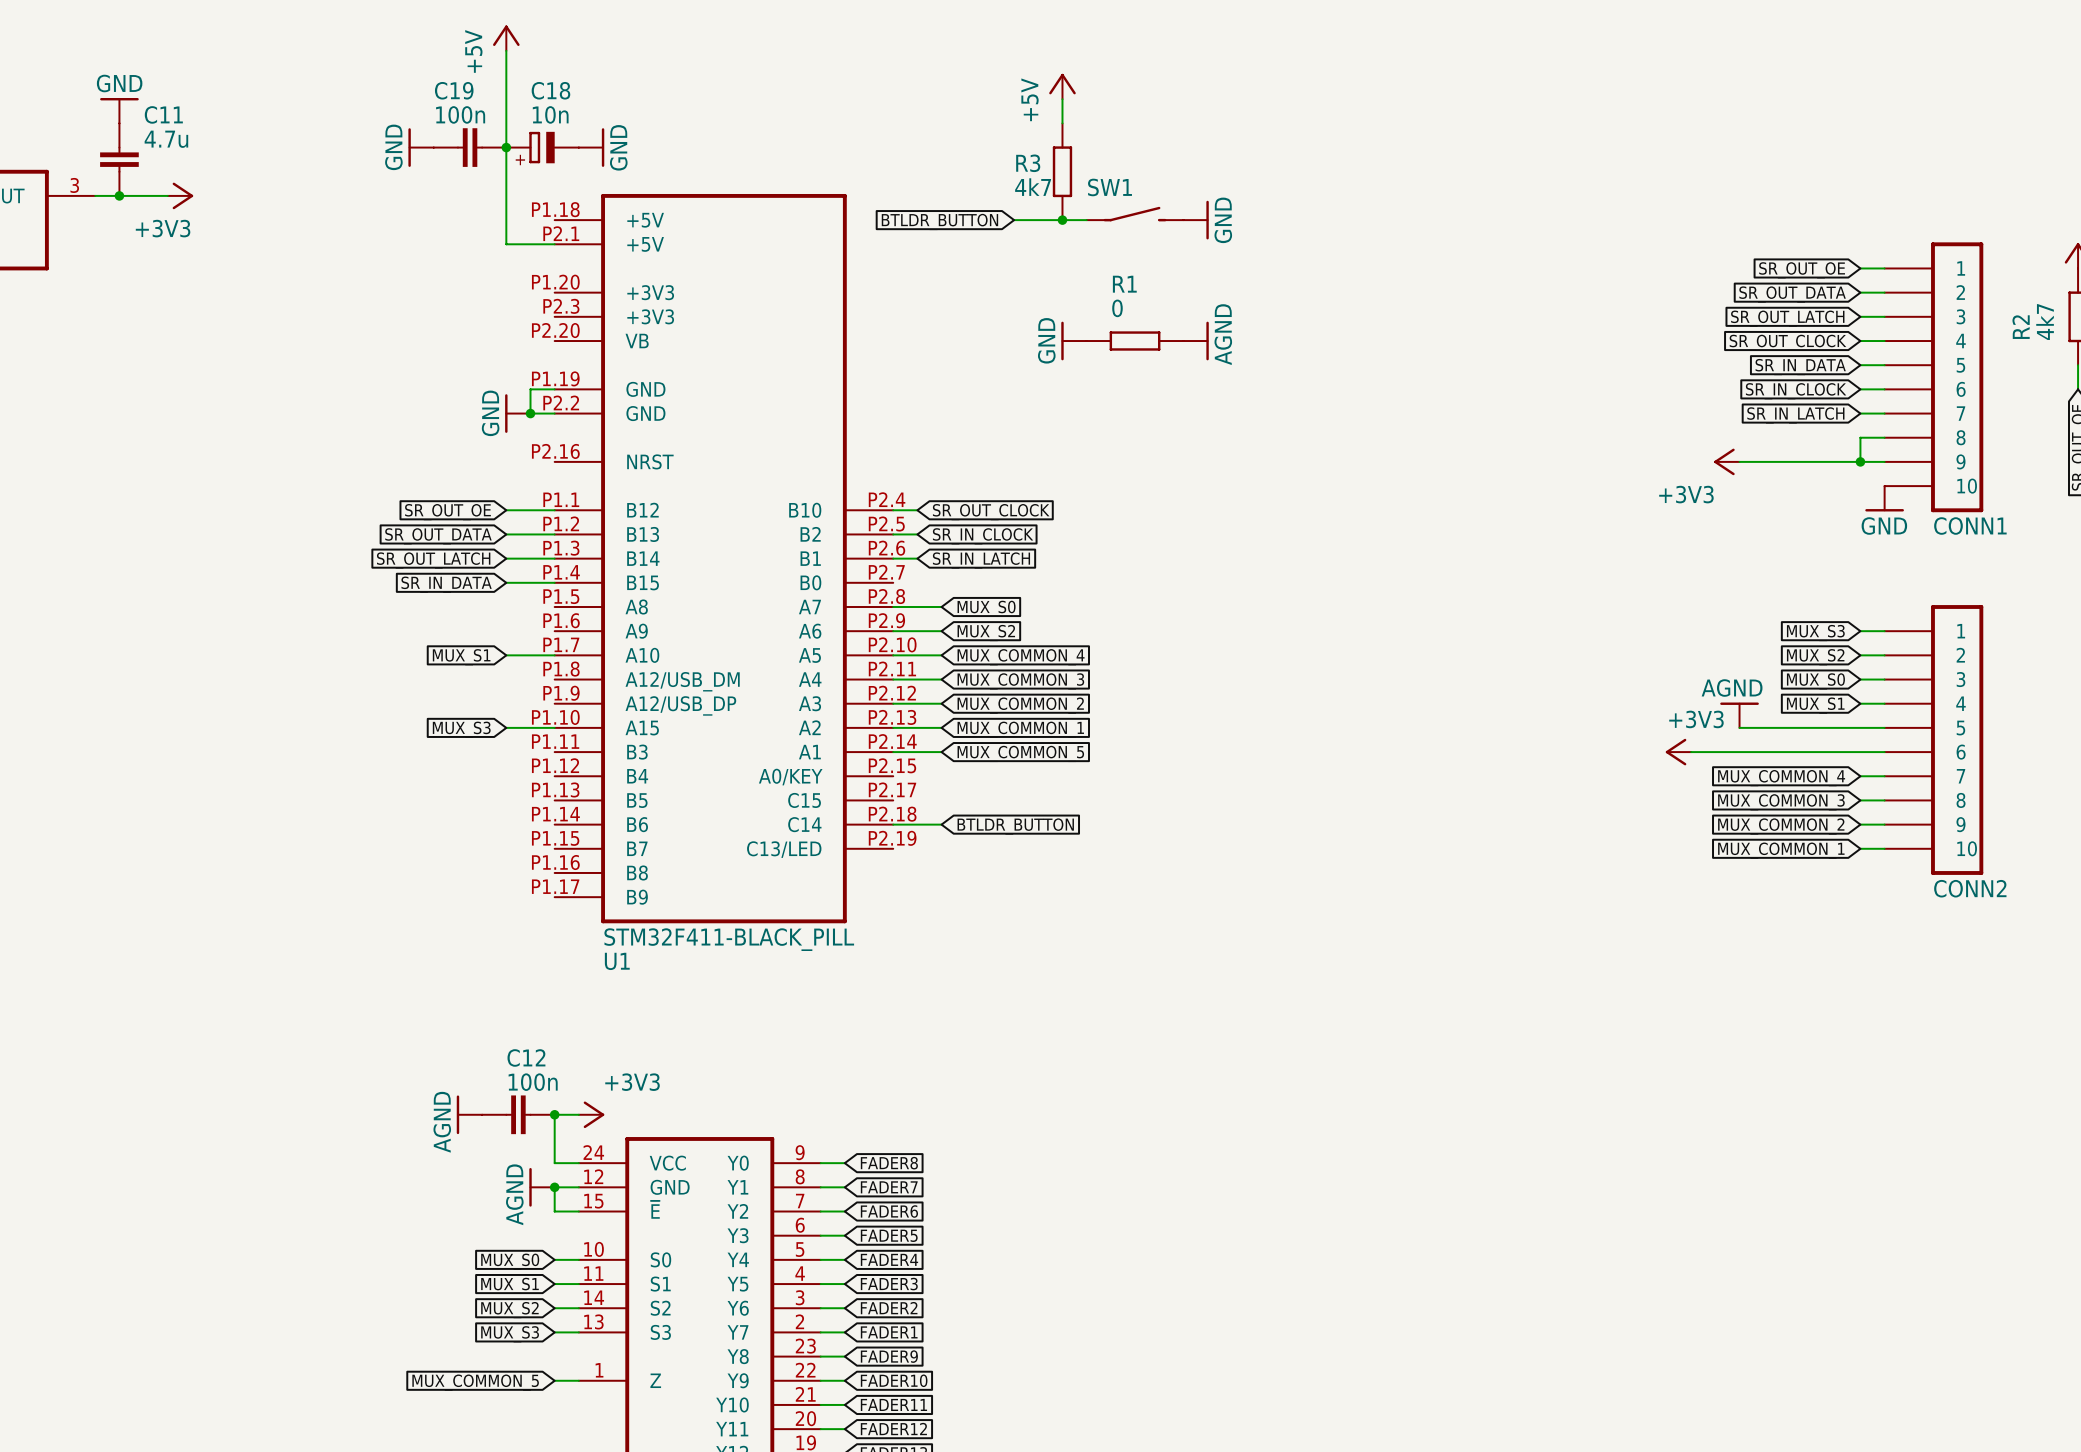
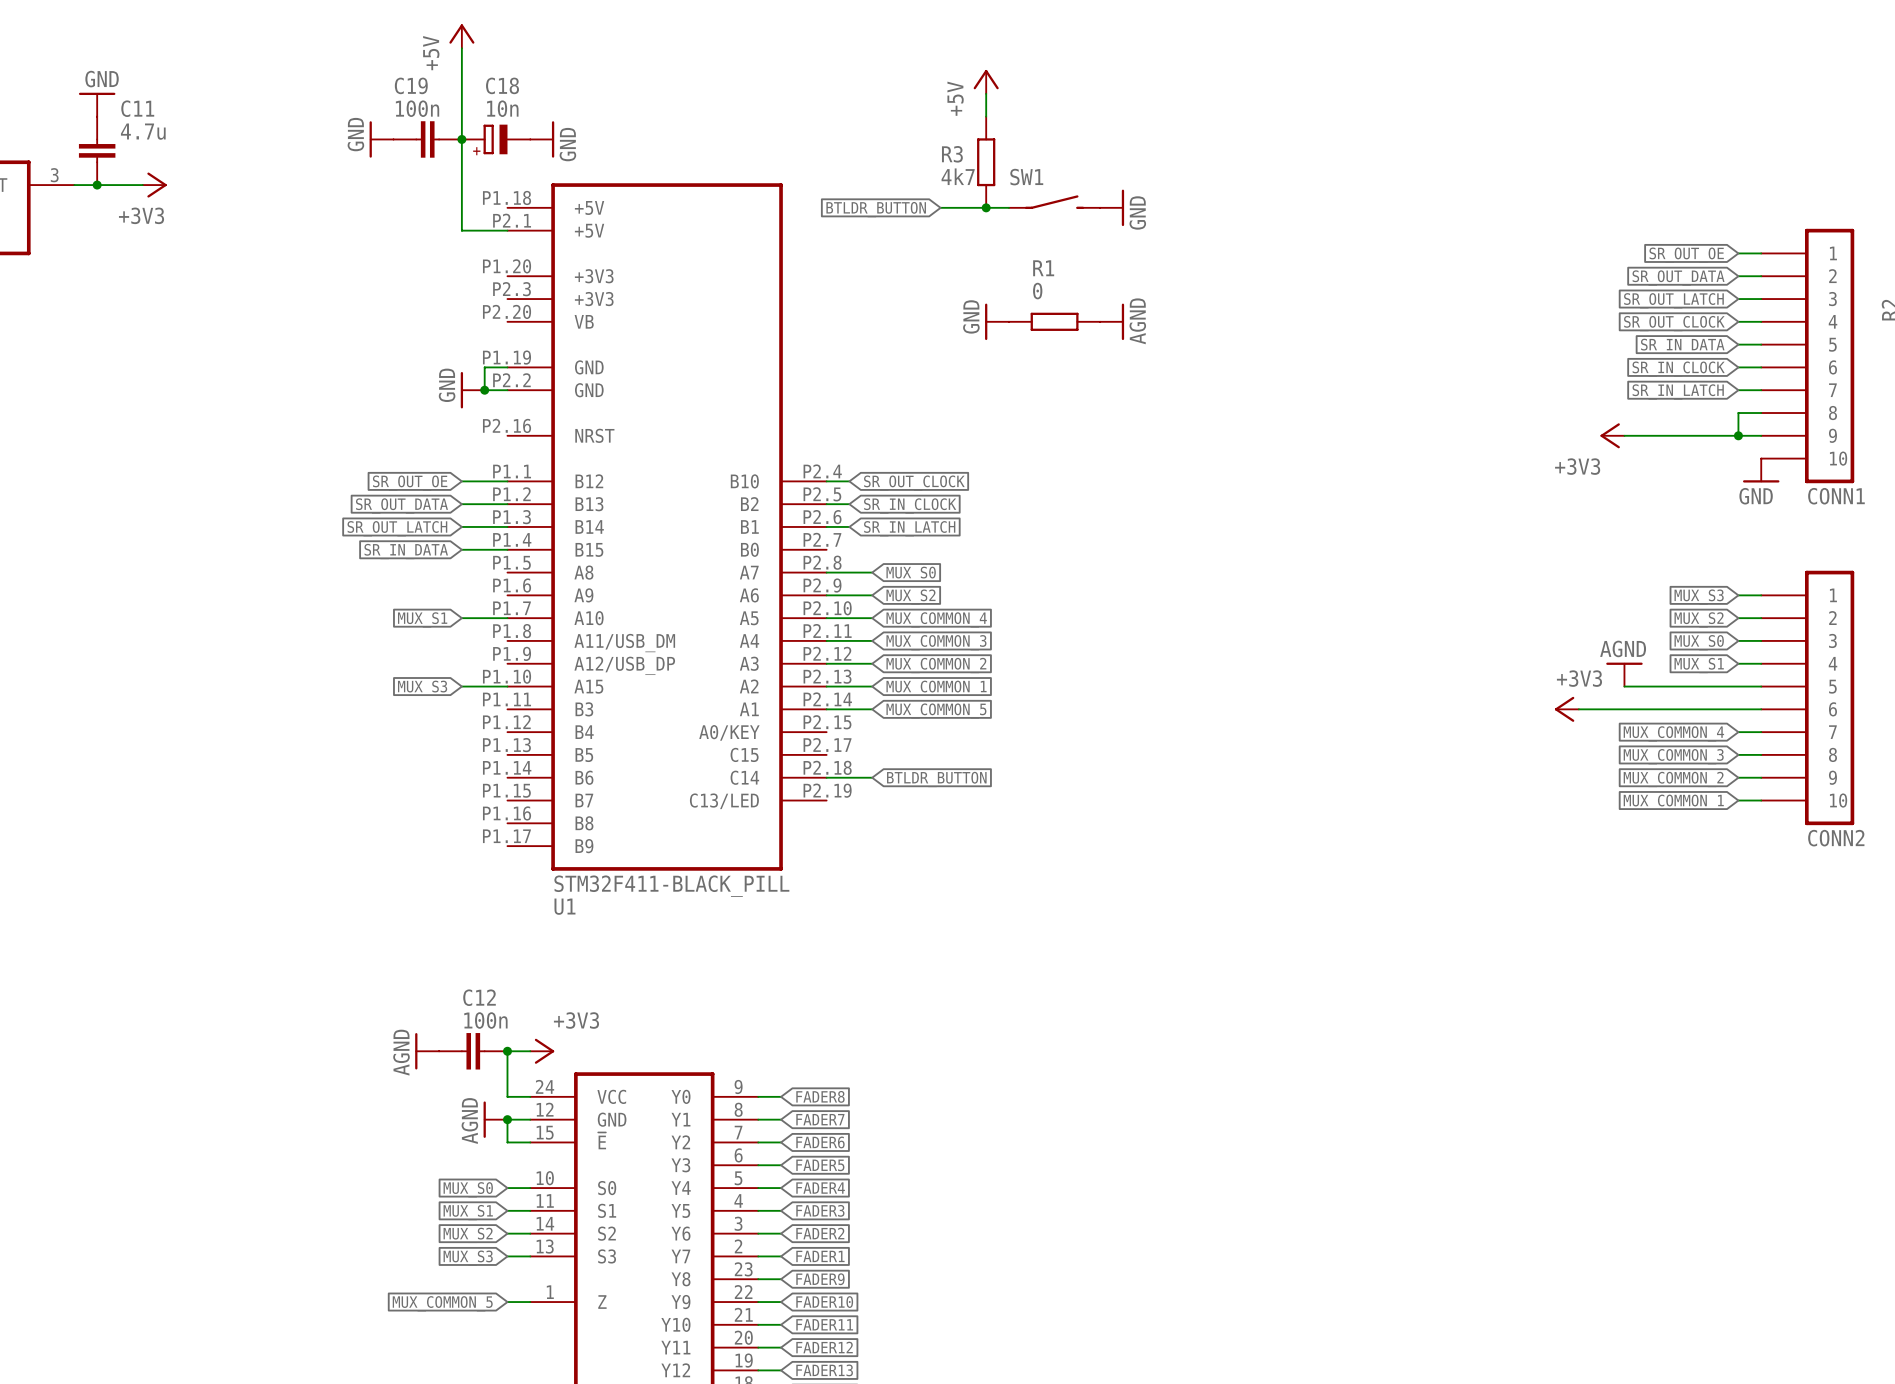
U1 pin name: A12/USB_DM (682, 681) -> A11/USB_DM (624, 643)

